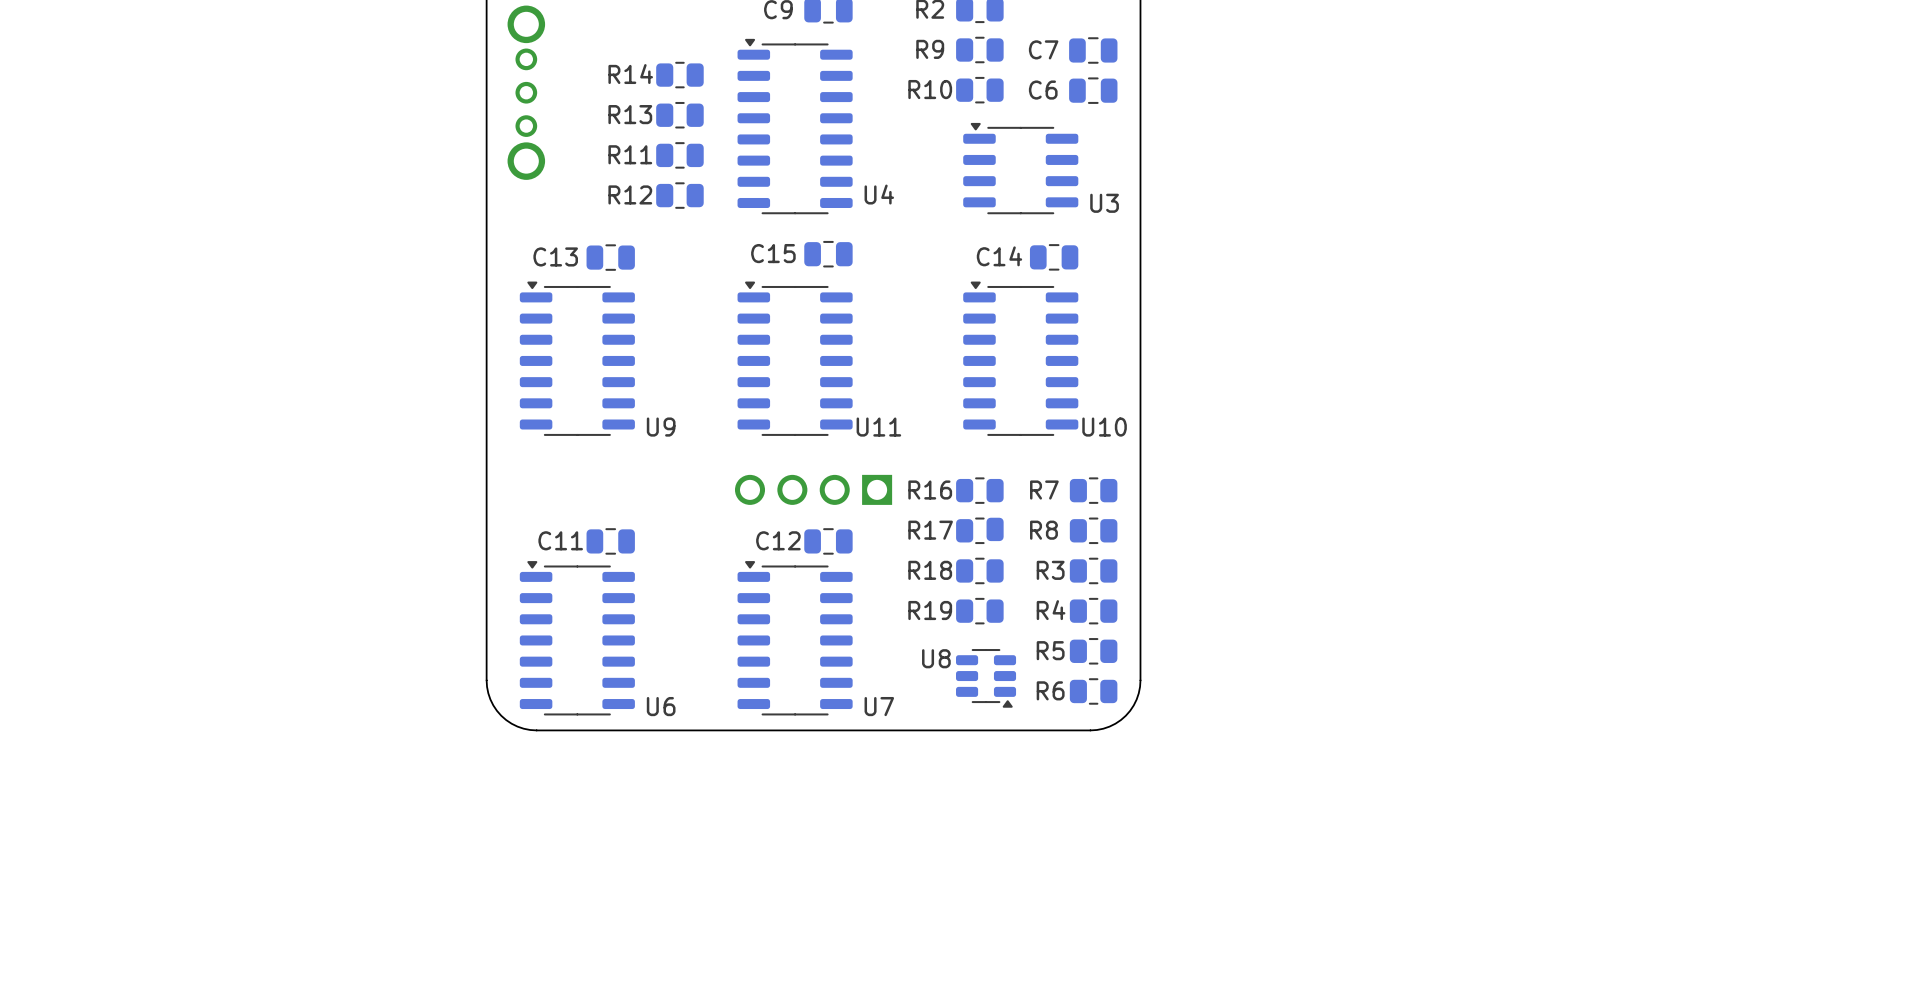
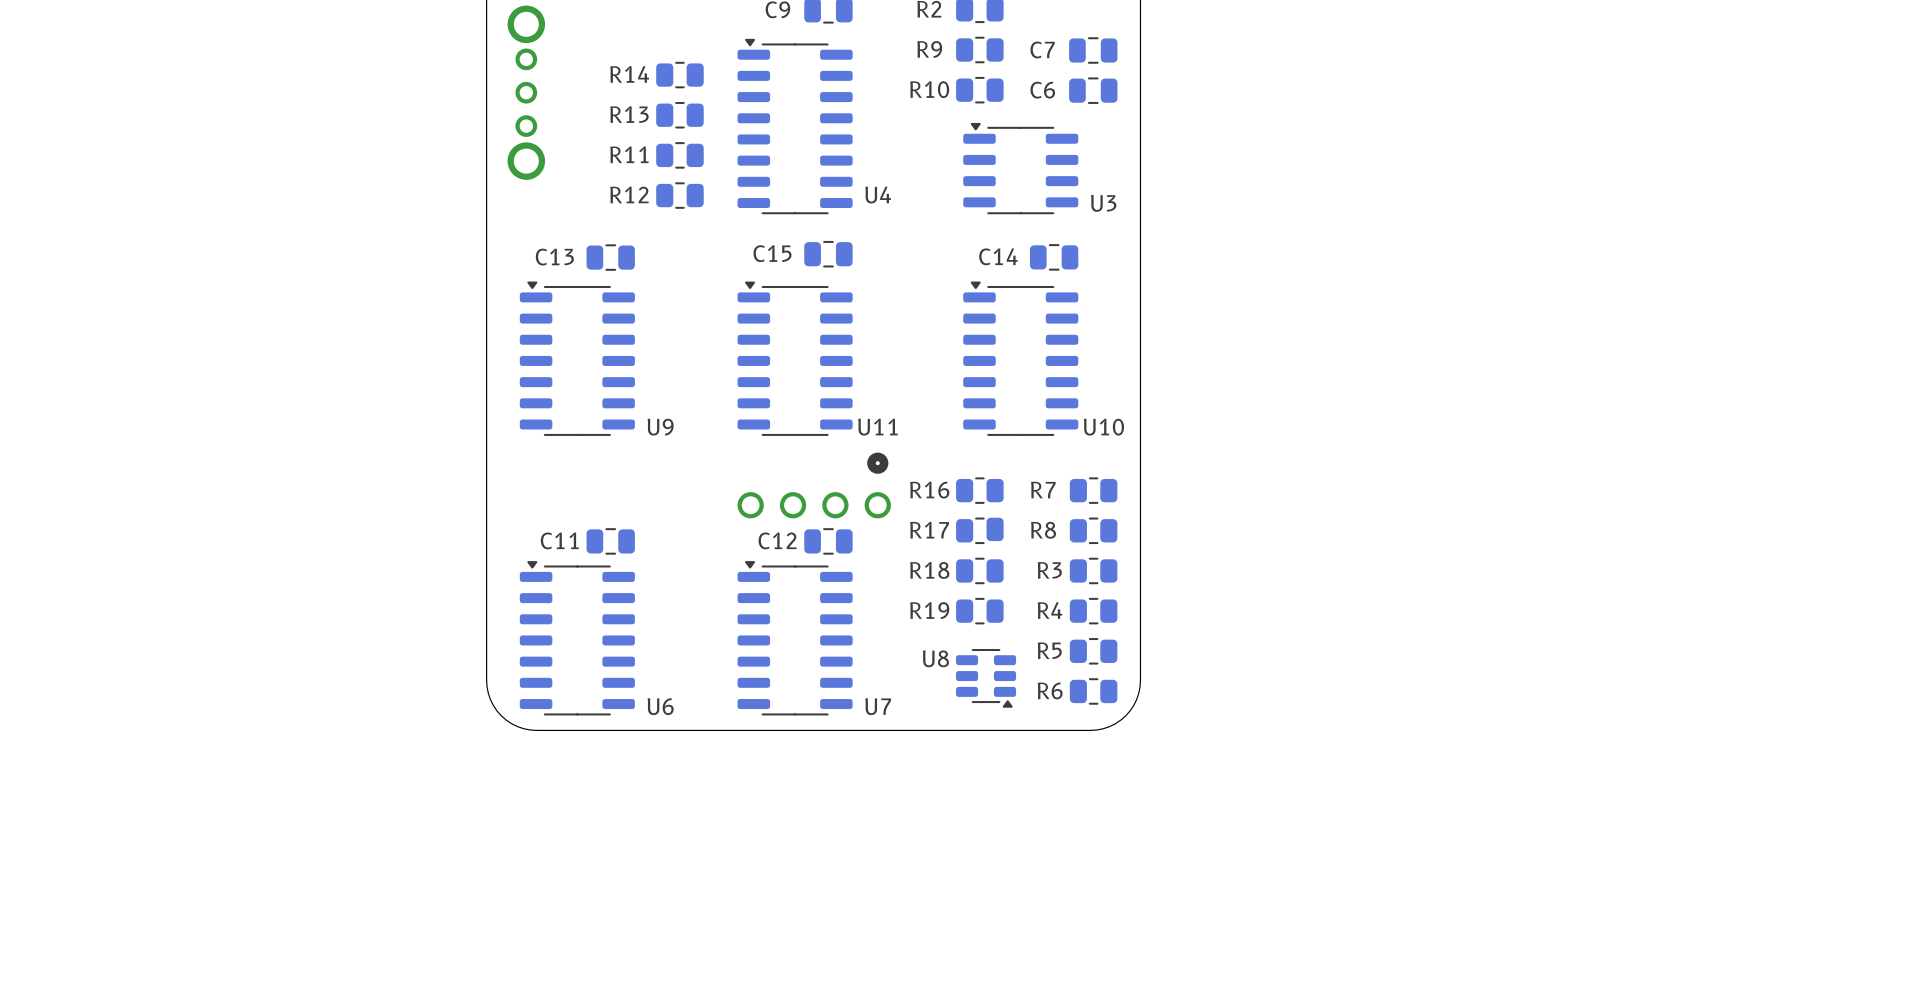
part footprint: [734, 474, 893, 505] -> [737, 452, 891, 519]

